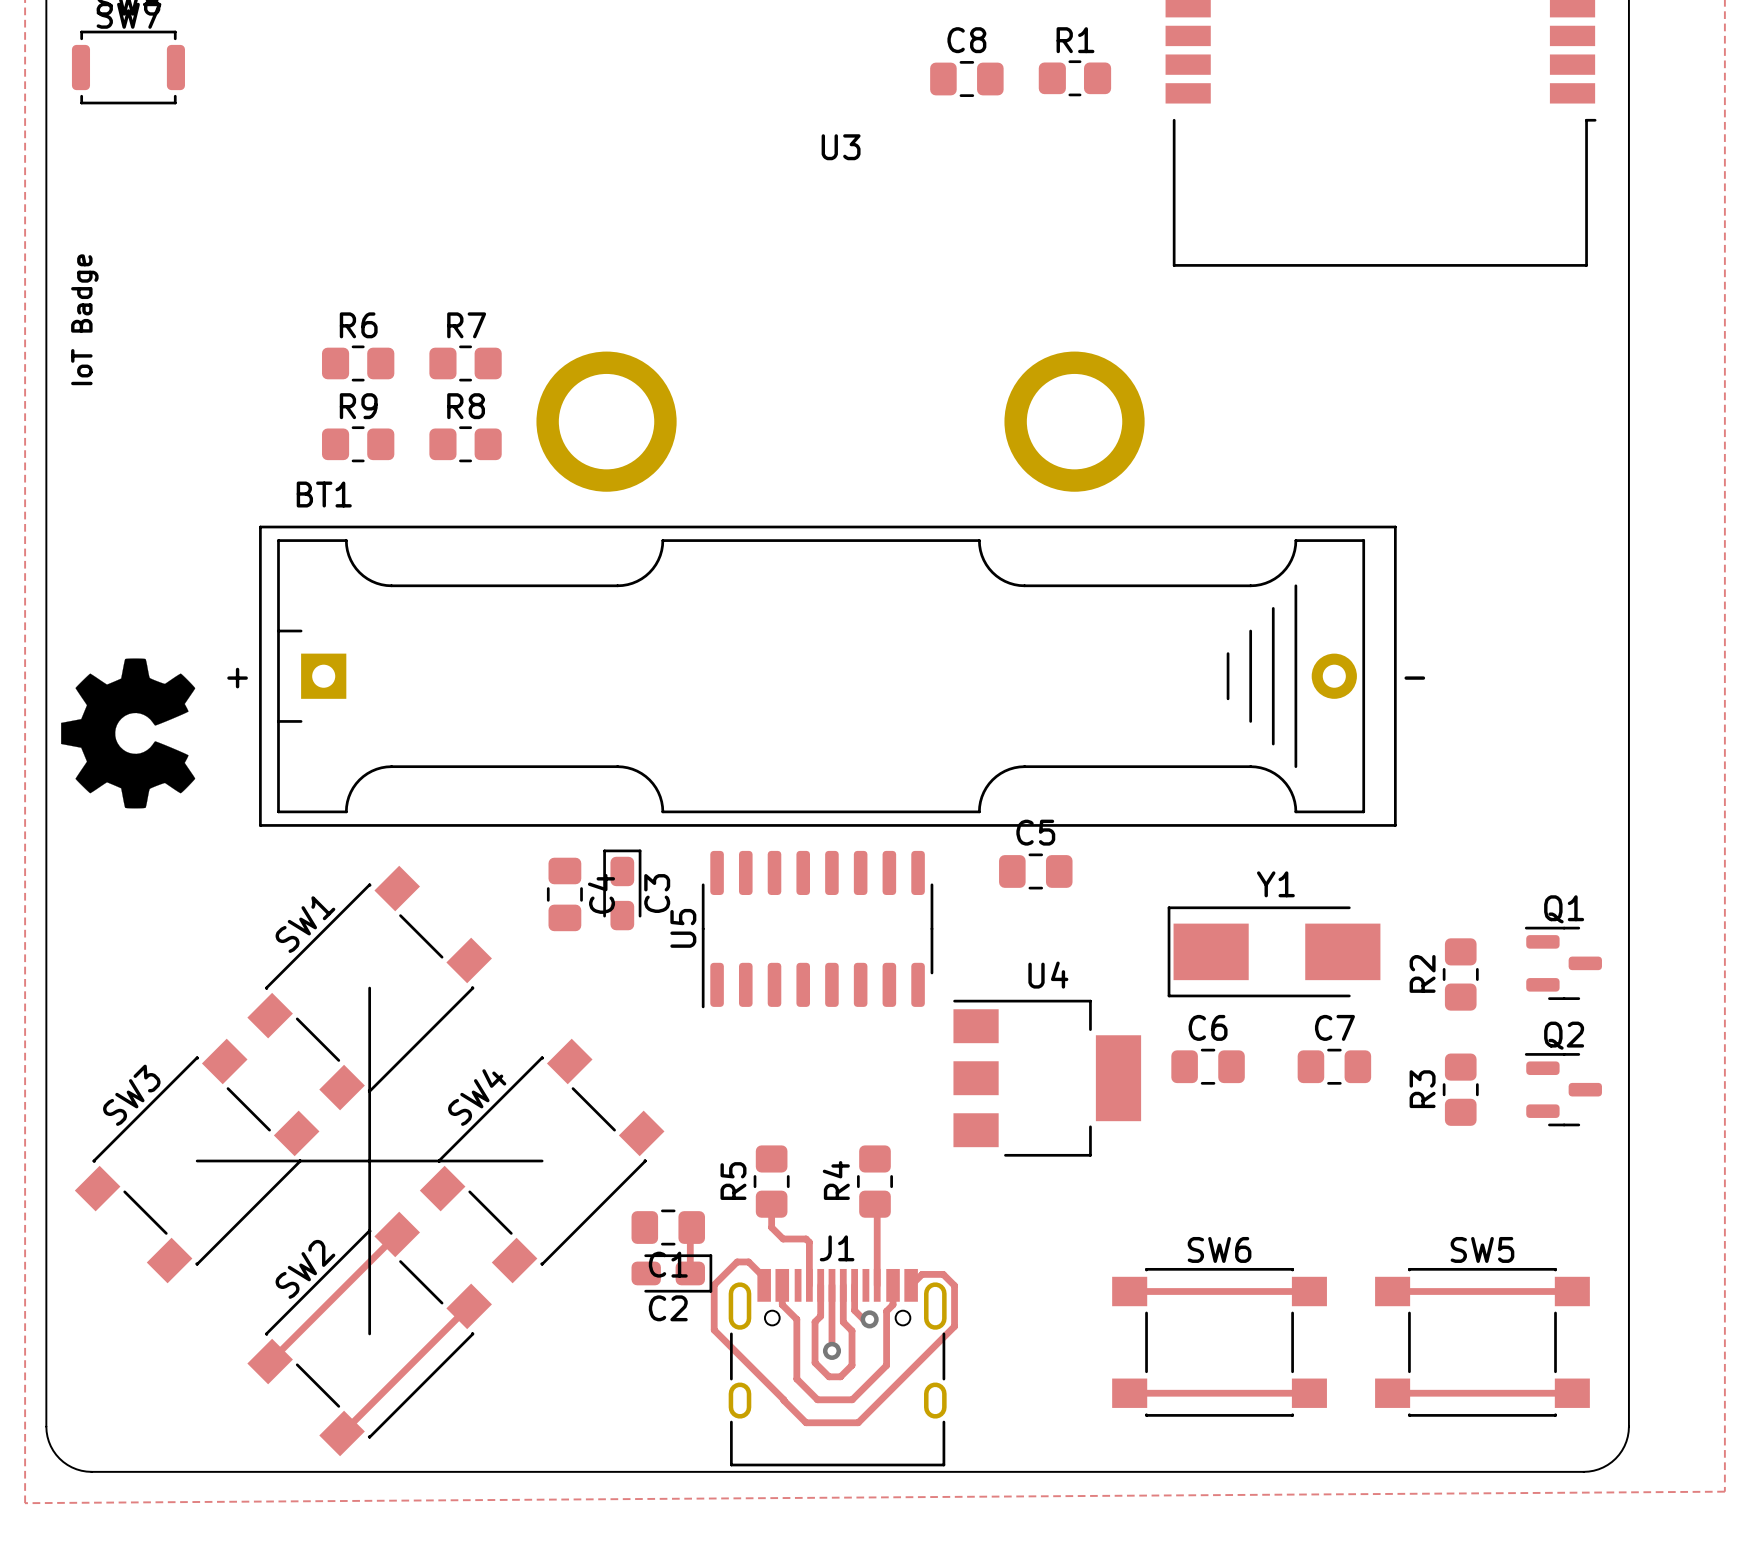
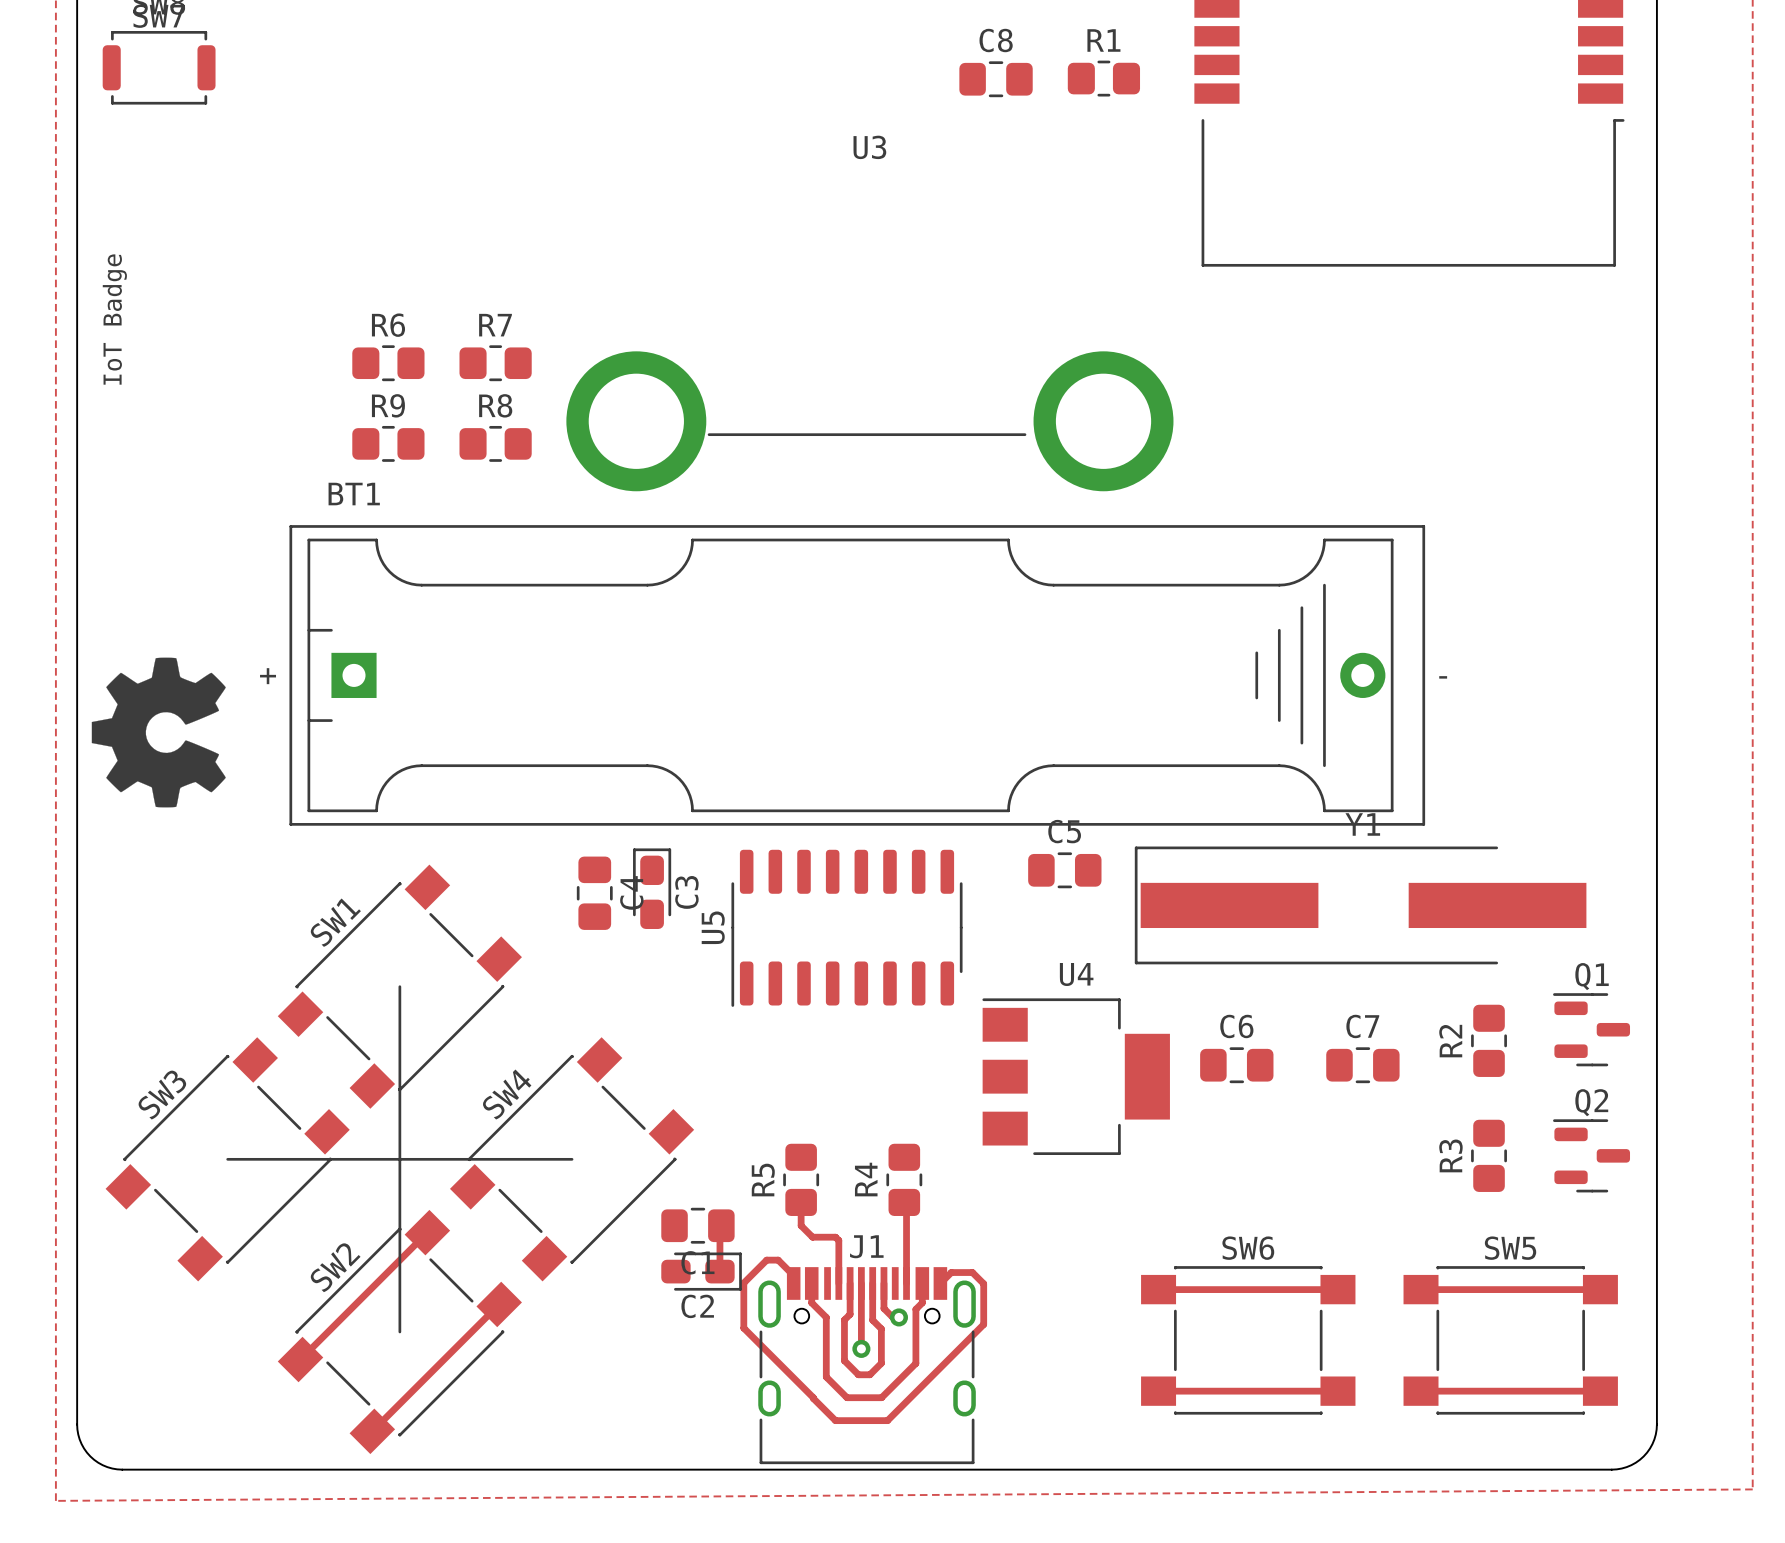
line: none -> (709, 434) (1025, 434)
Y1 footprint: [1167, 906, 1381, 998] -> [1134, 846, 1587, 965]
Q1 position: (1563, 963) -> (1591, 1029)
R2 position: (1460, 974) -> (1489, 1040)
R3 position: (1460, 1089) -> (1489, 1155)
Q2 position: (1563, 1089) -> (1591, 1155)

